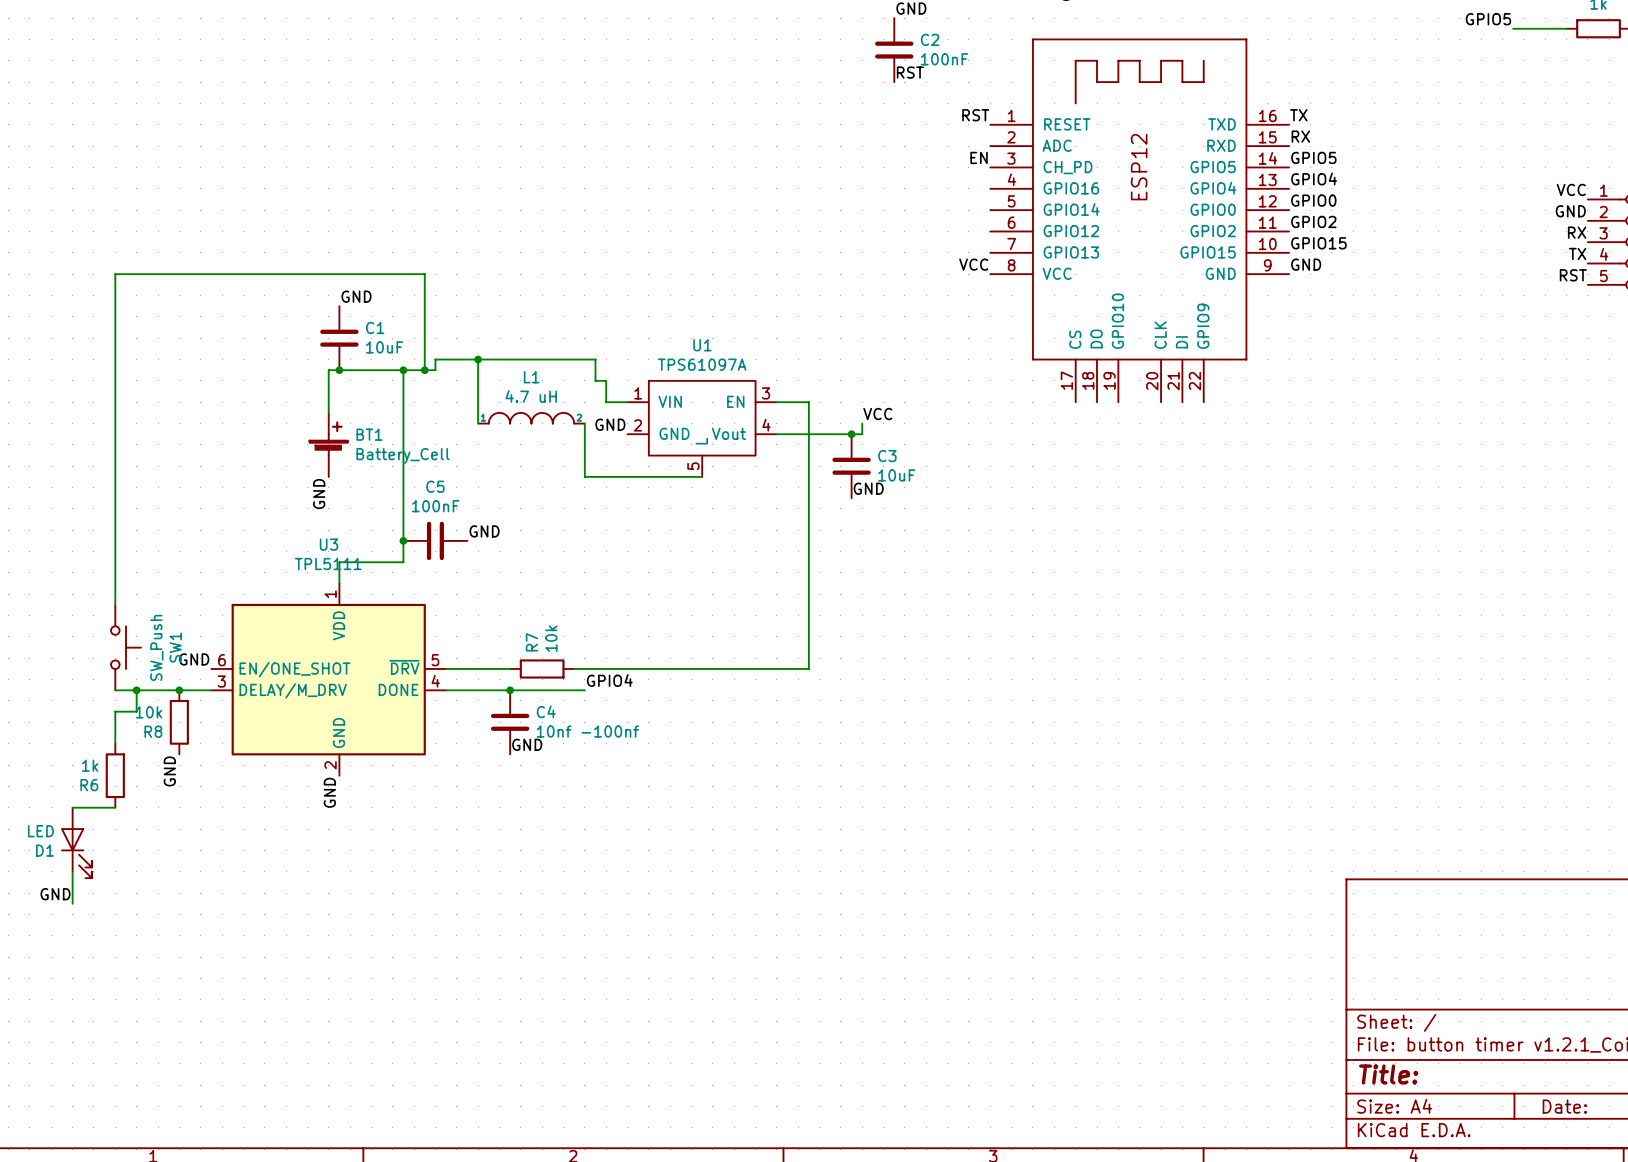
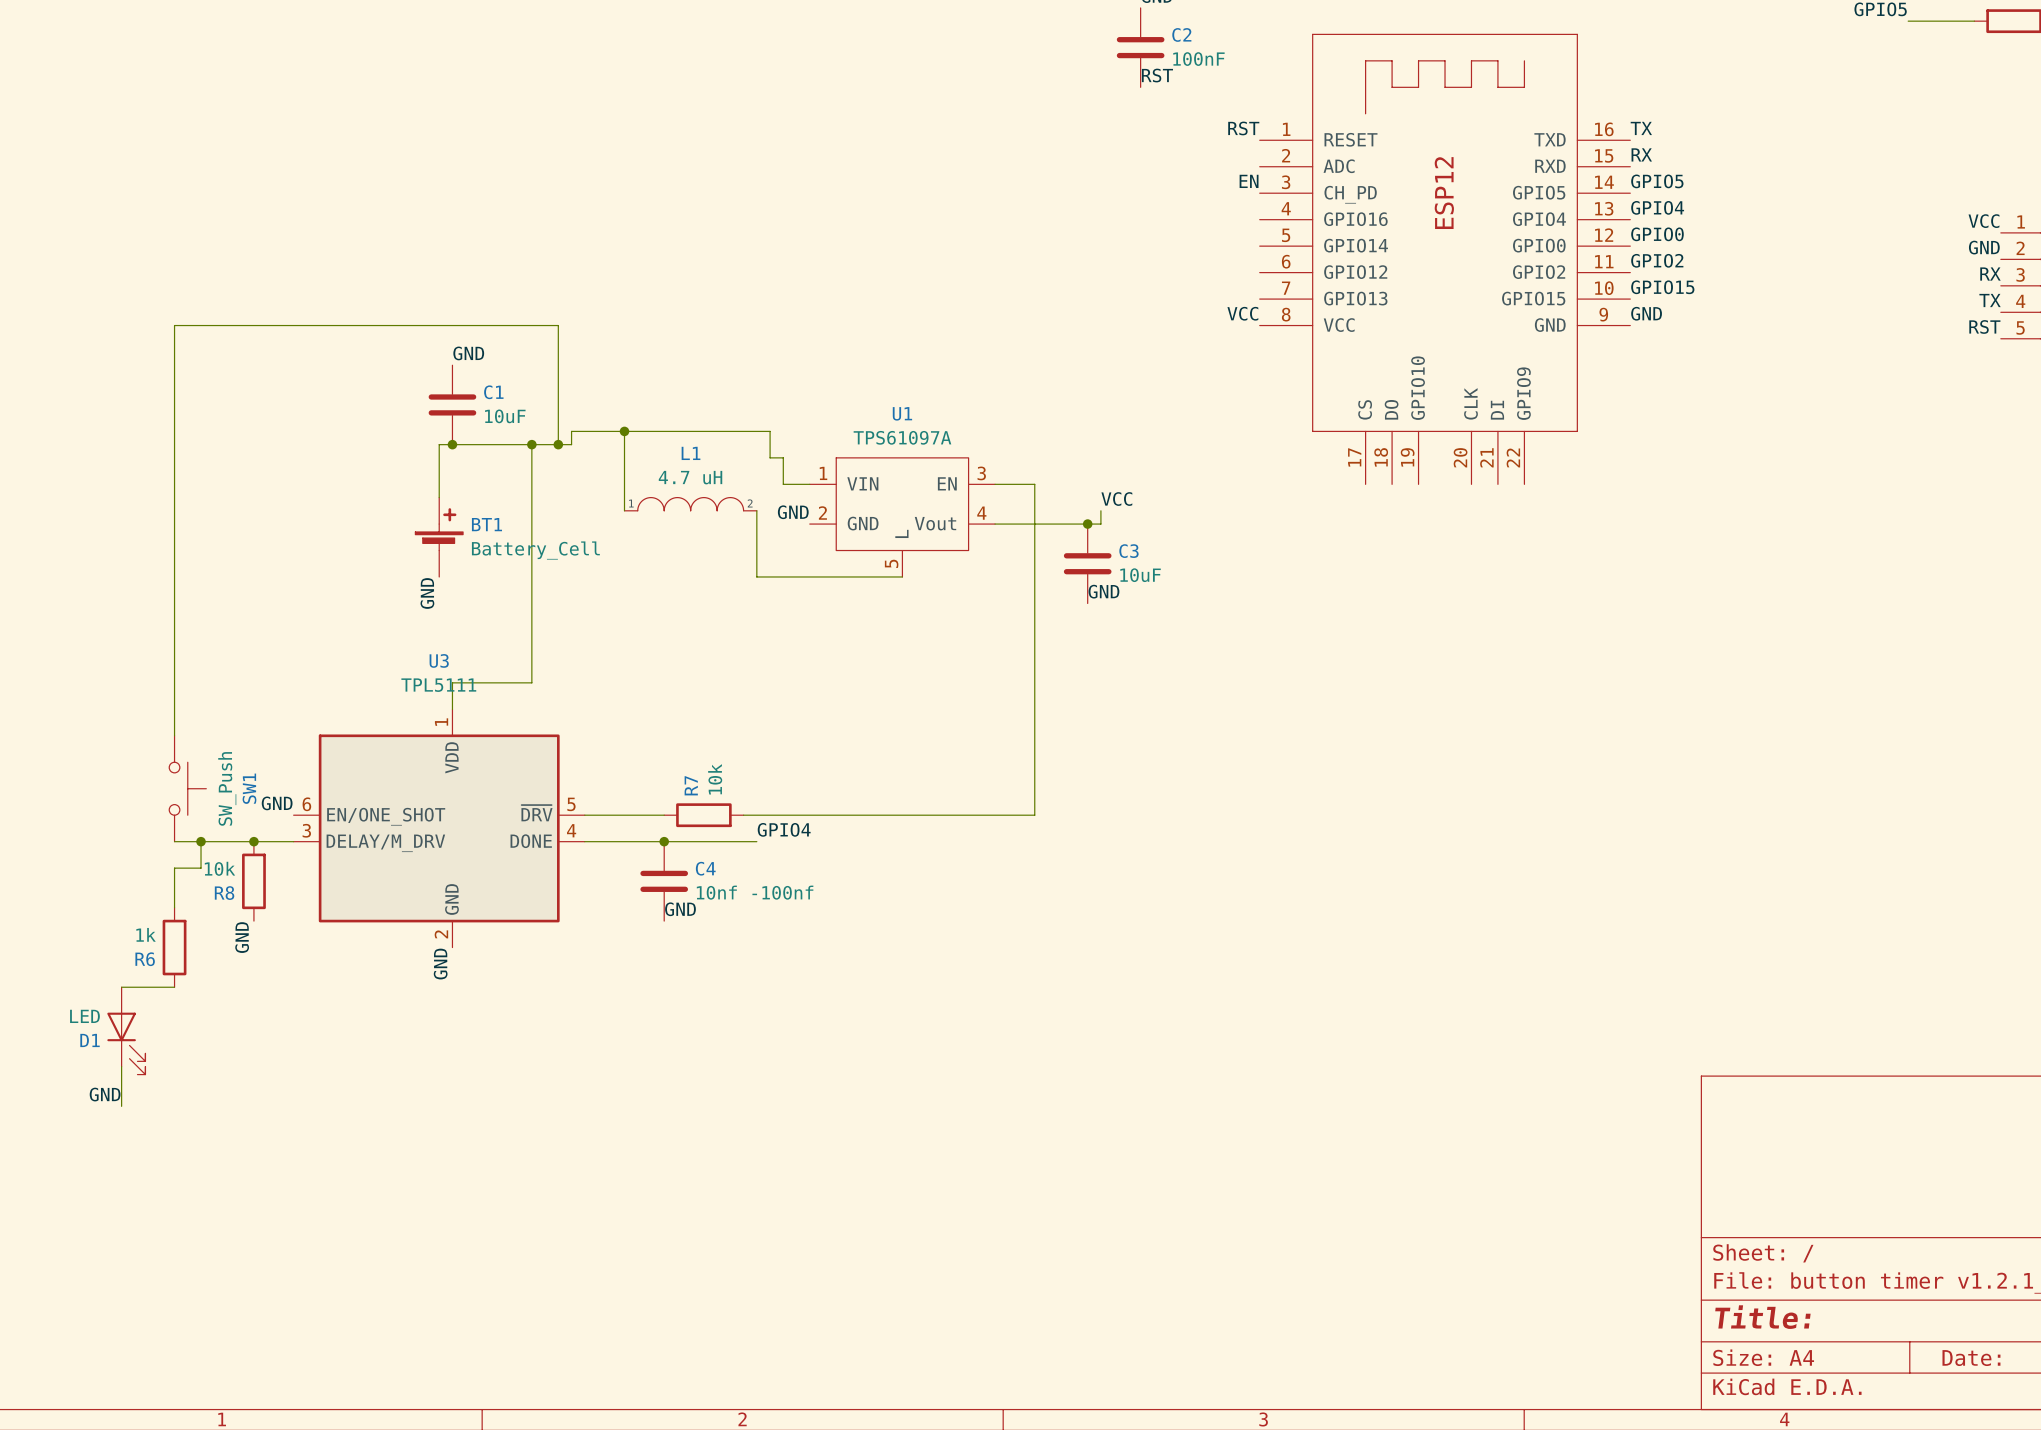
label: GND (484, 531) -> none
junction: (403, 540) -> none
C5: 100nF (435, 540) -> none

